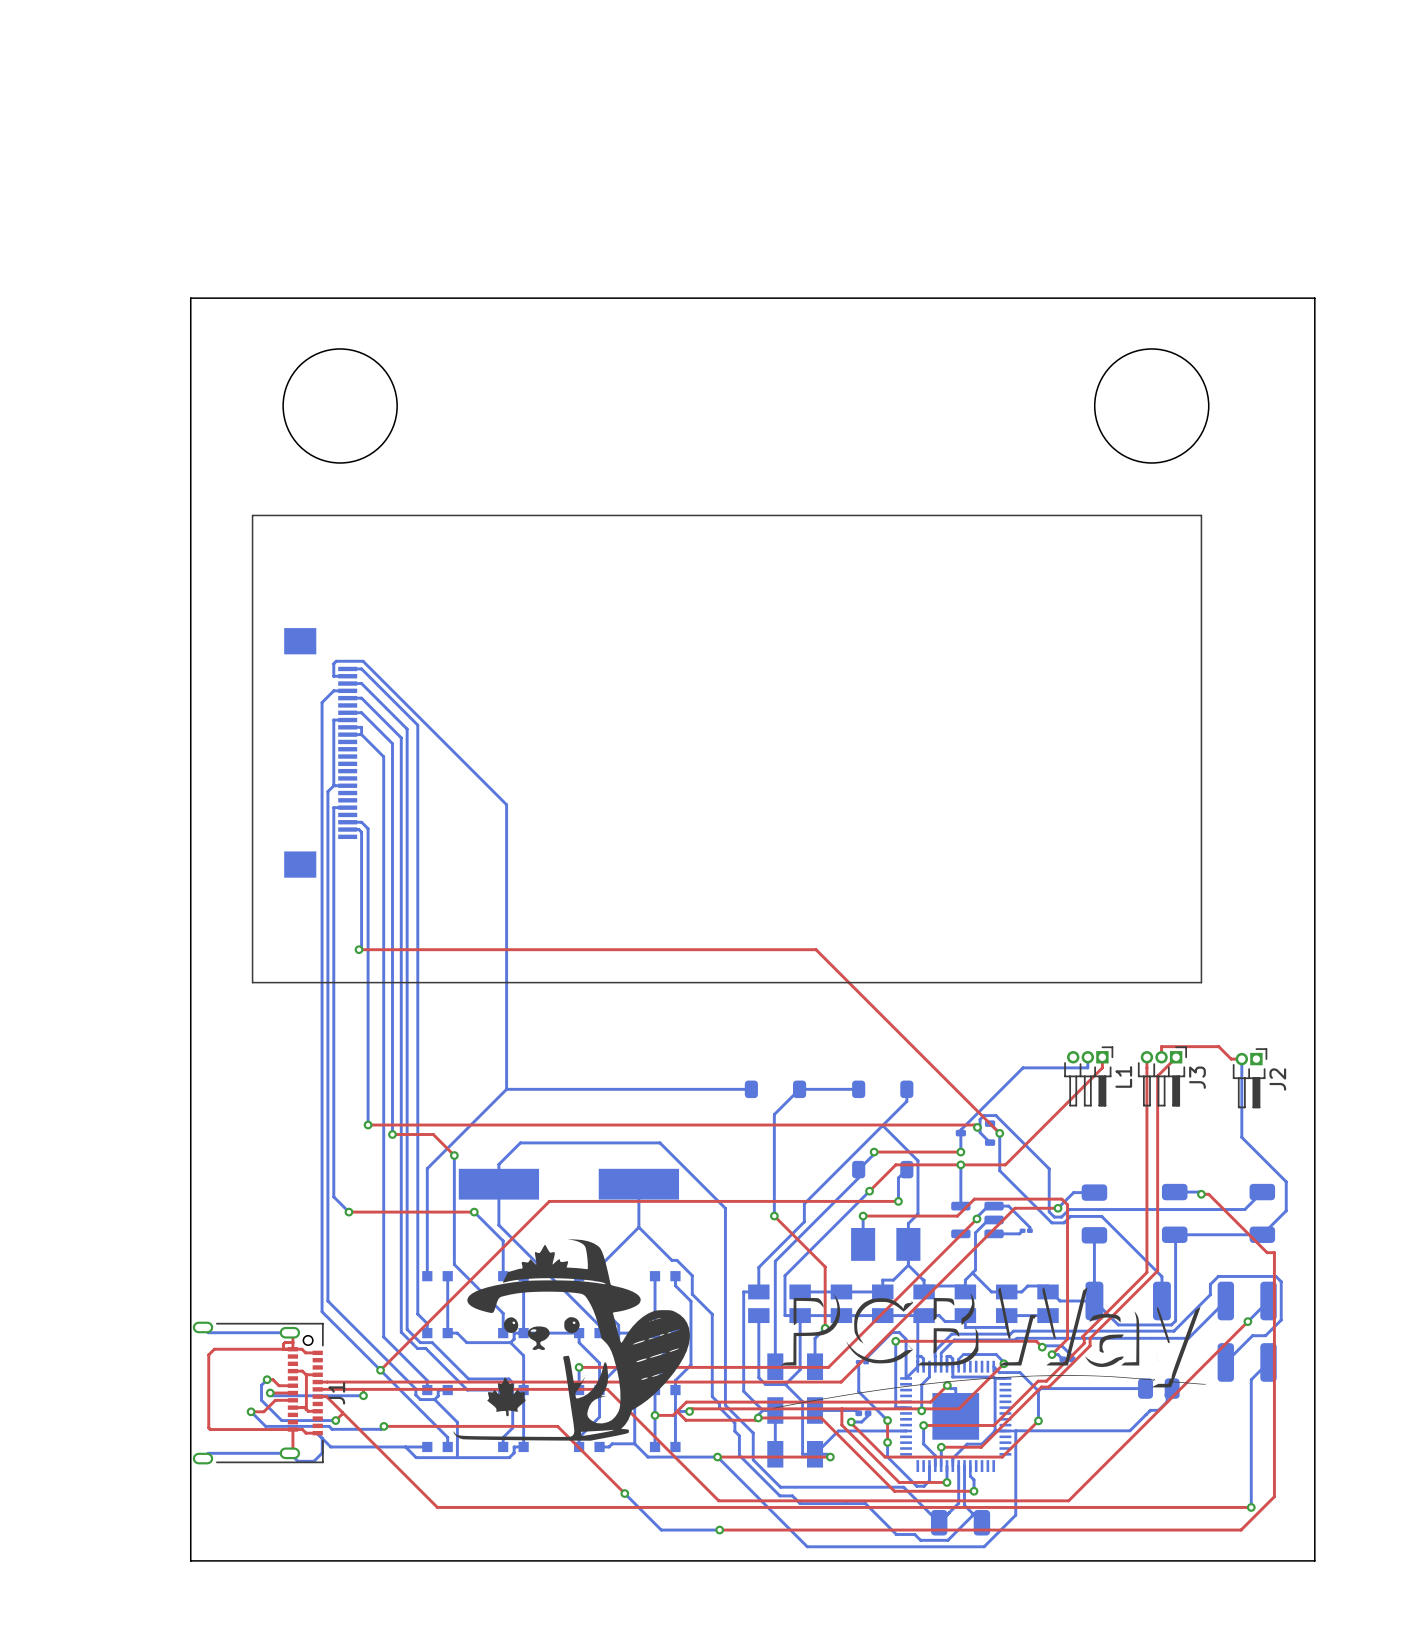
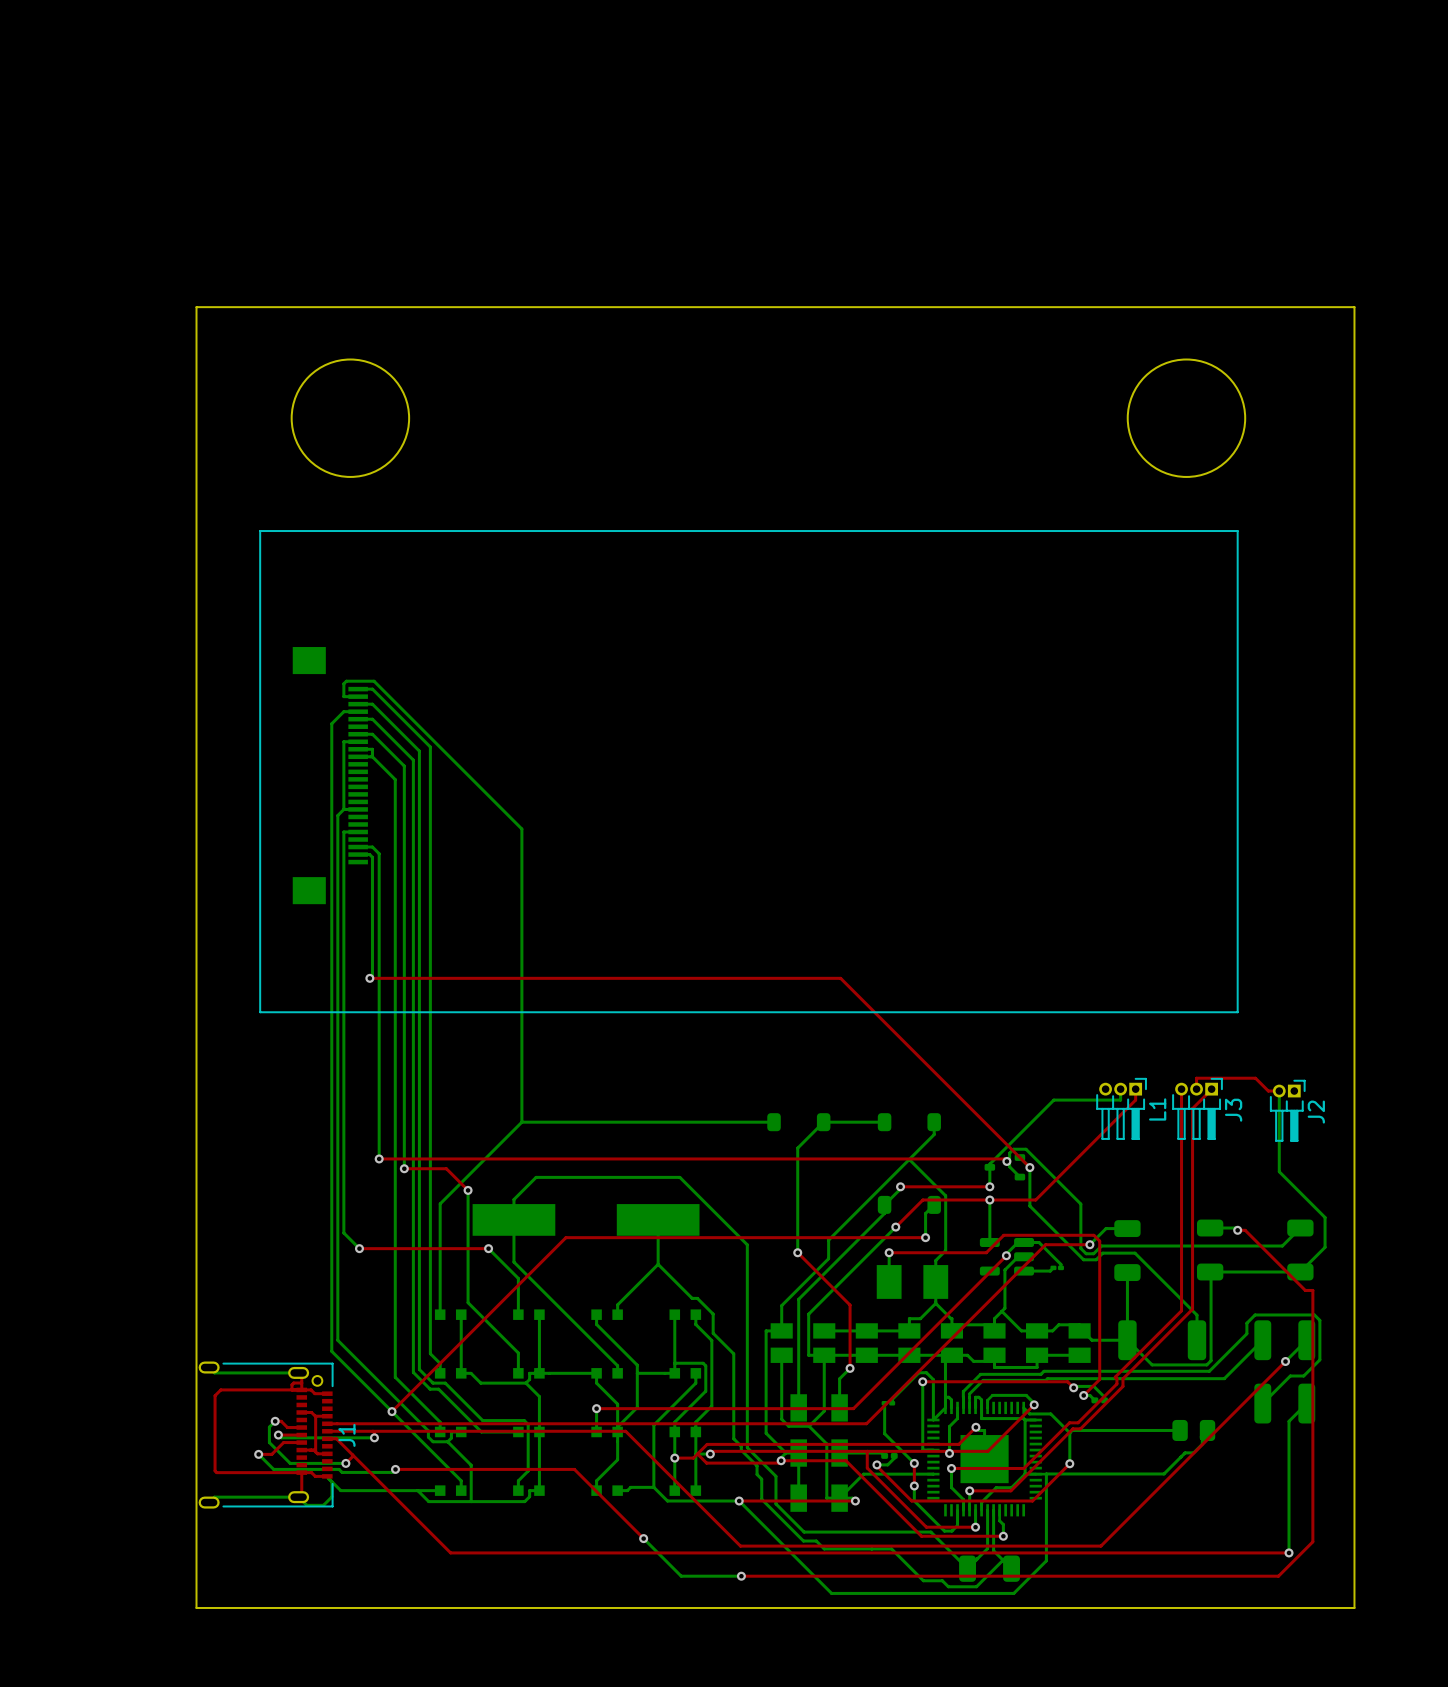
drawing: [453, 1239, 690, 1441] -> none
drawing: [773, 1287, 1208, 1409] -> none

